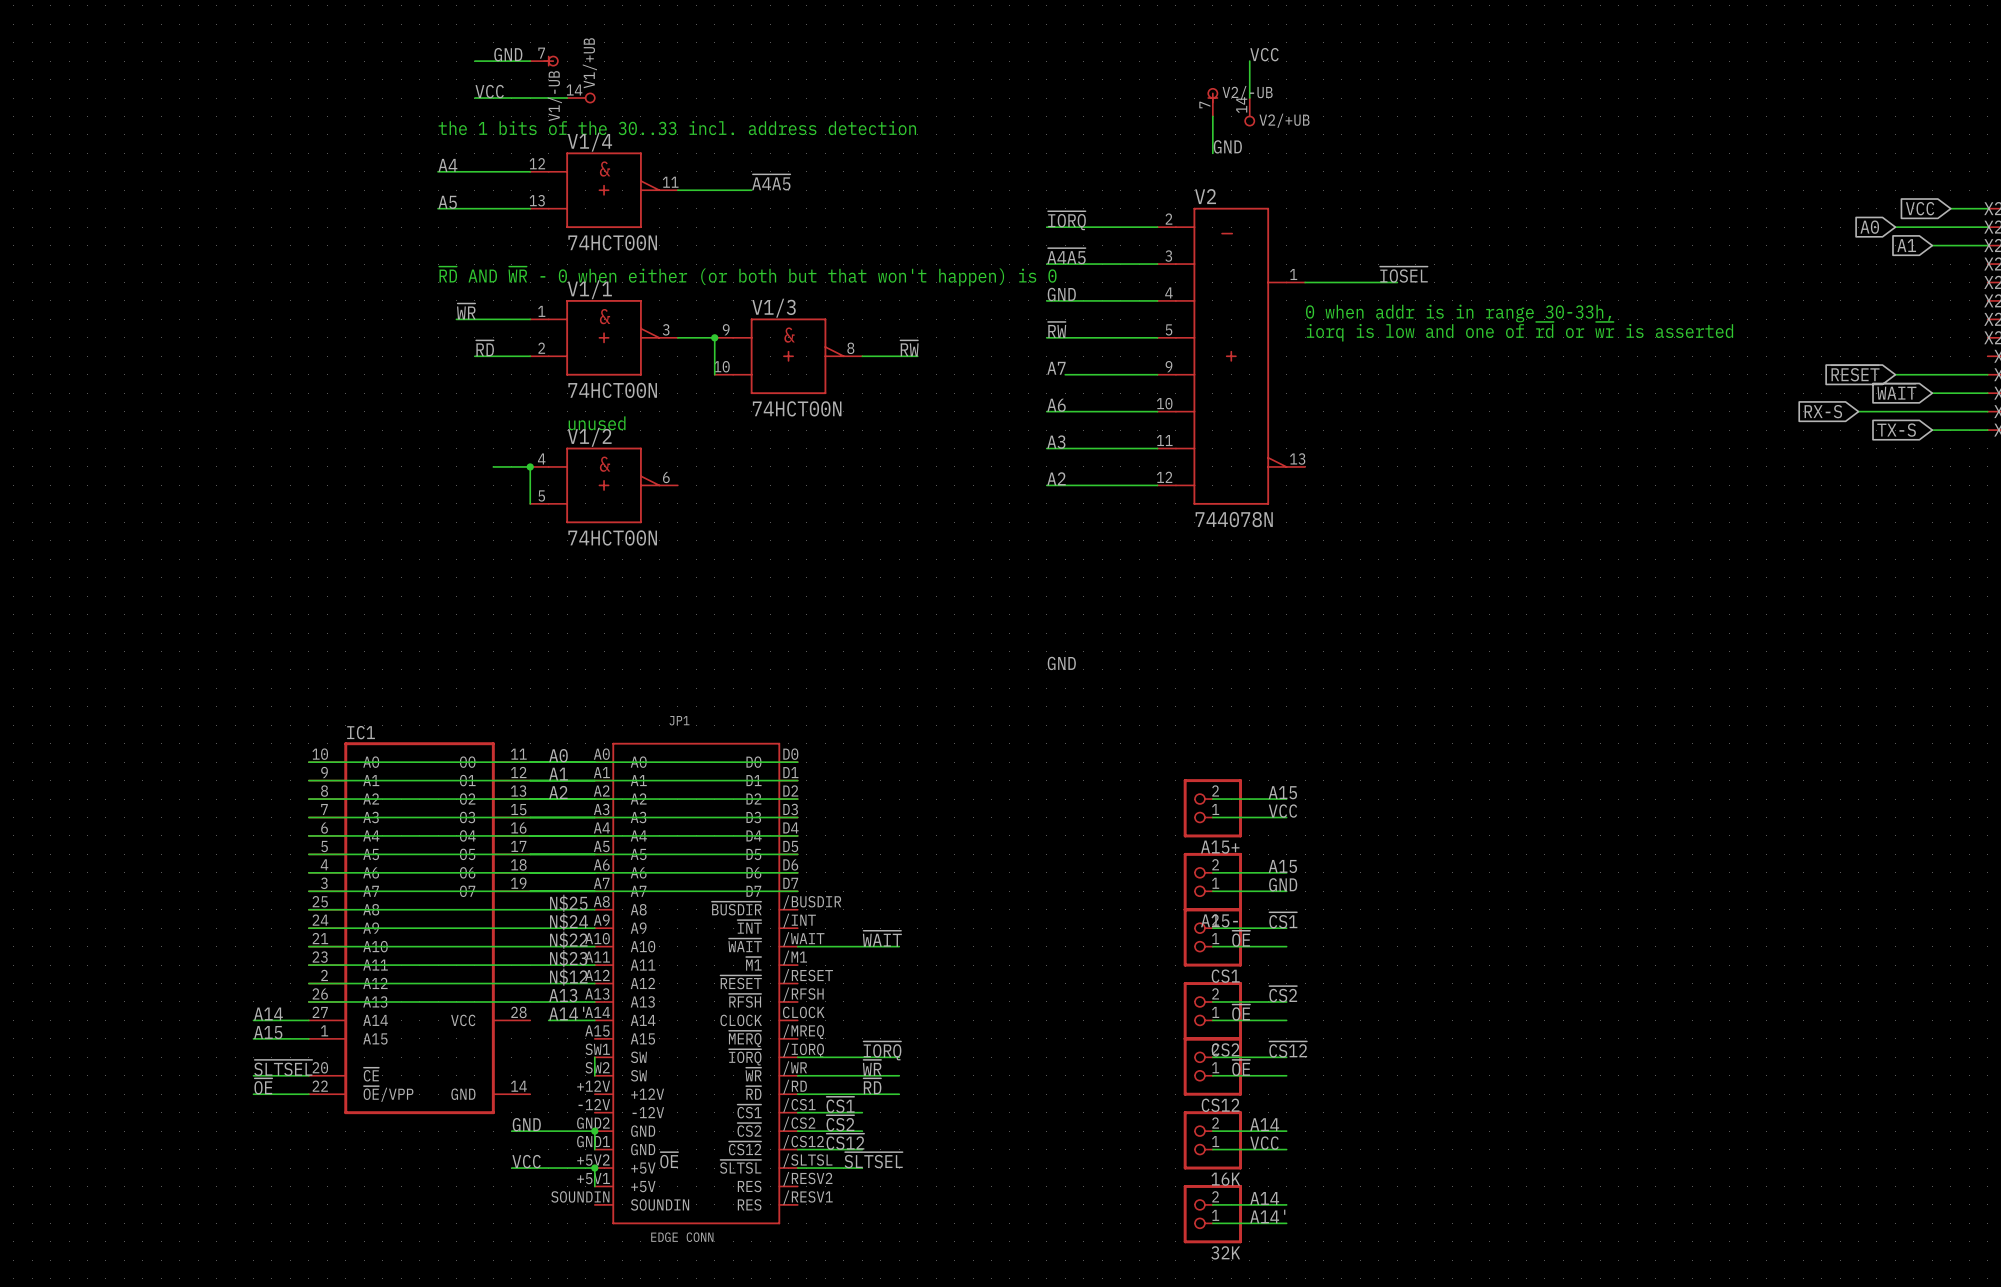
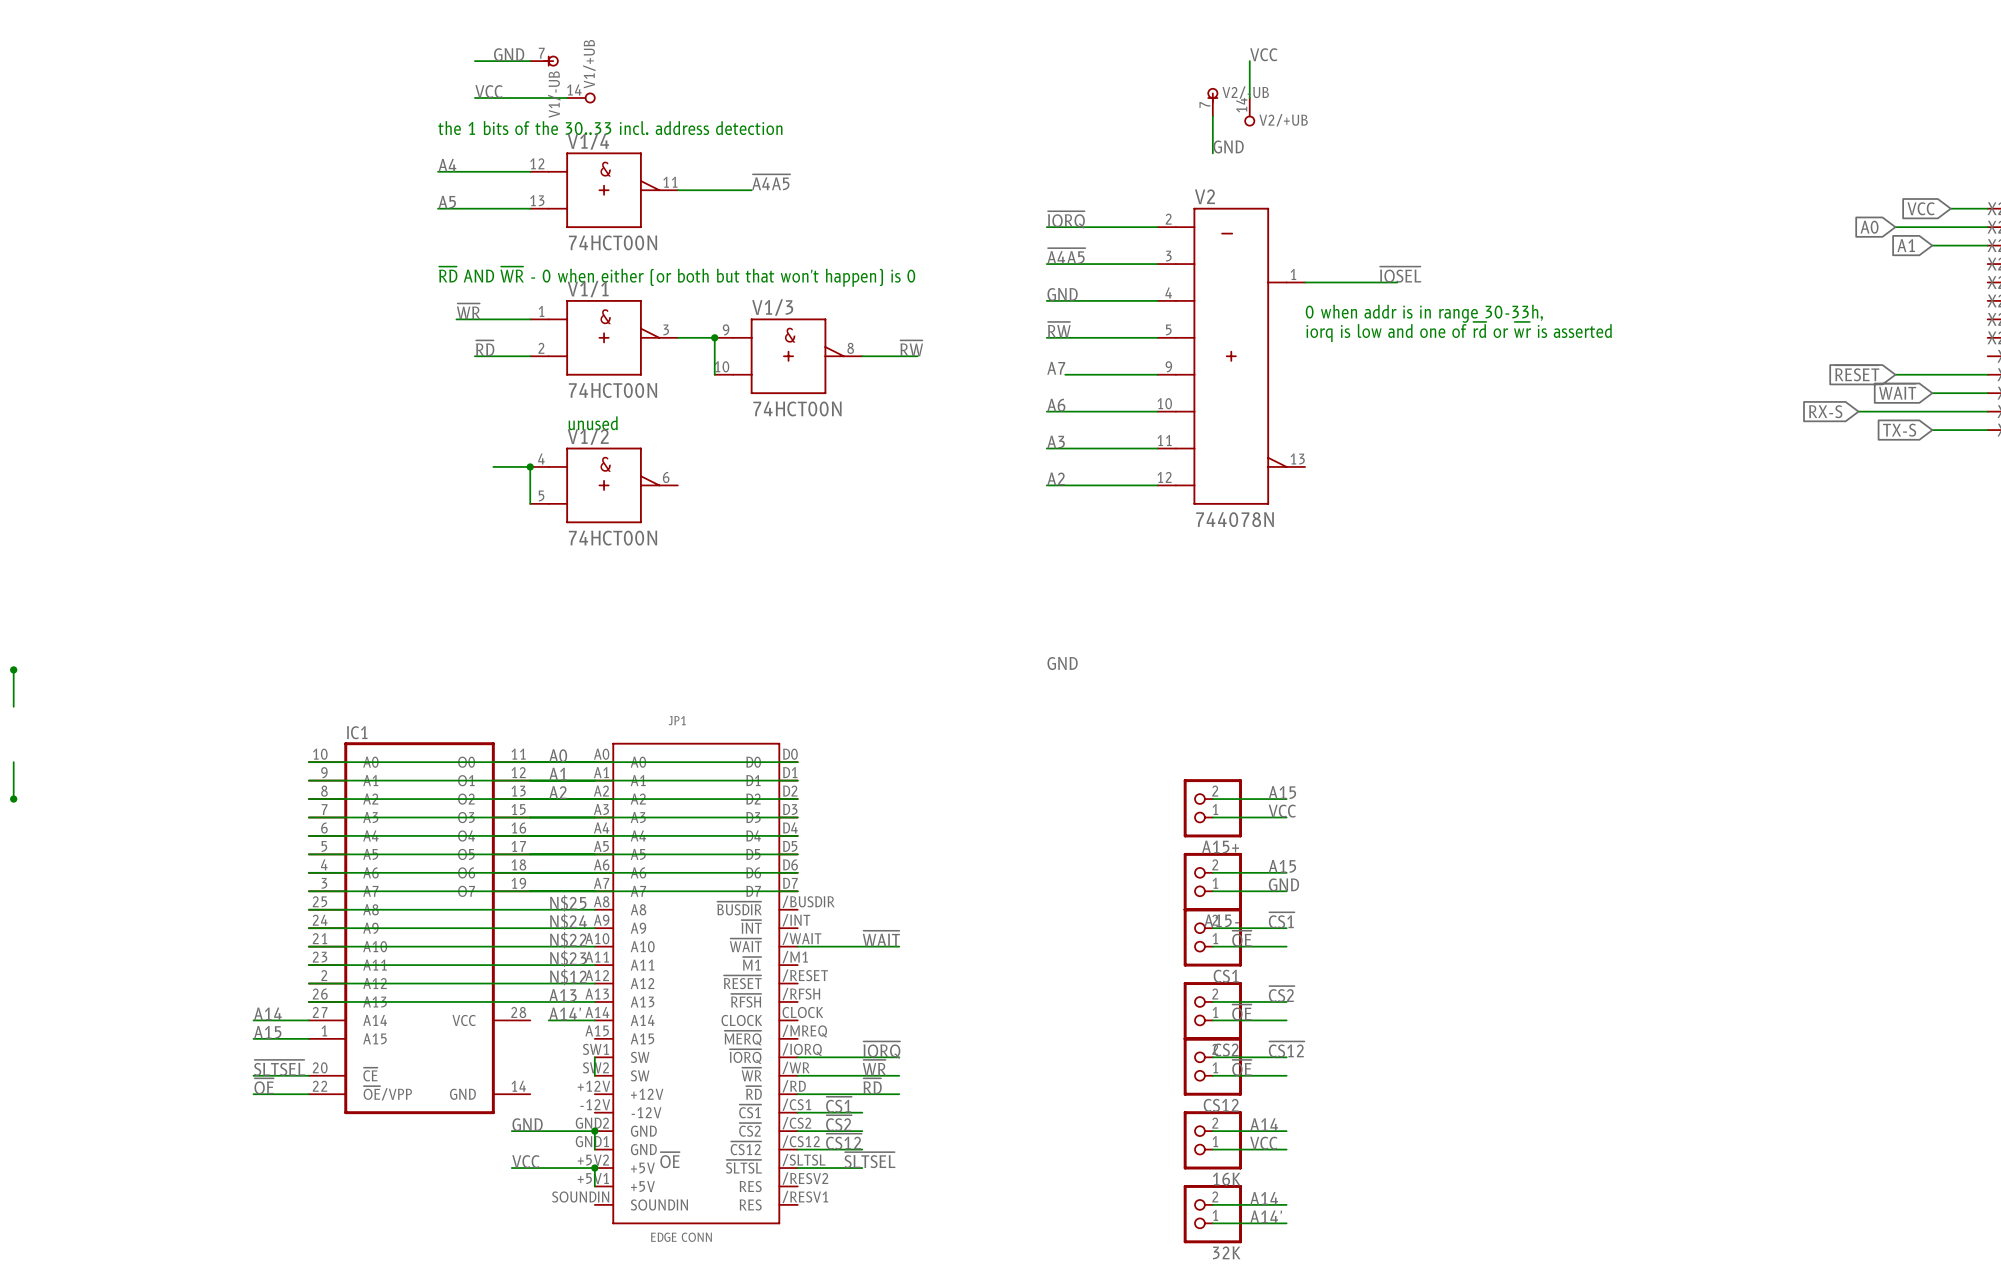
wire: none -> (13, 669) (13, 706)
junction: none -> (13, 669)
wire: none -> (13, 762) (13, 799)
junction: none -> (13, 799)

